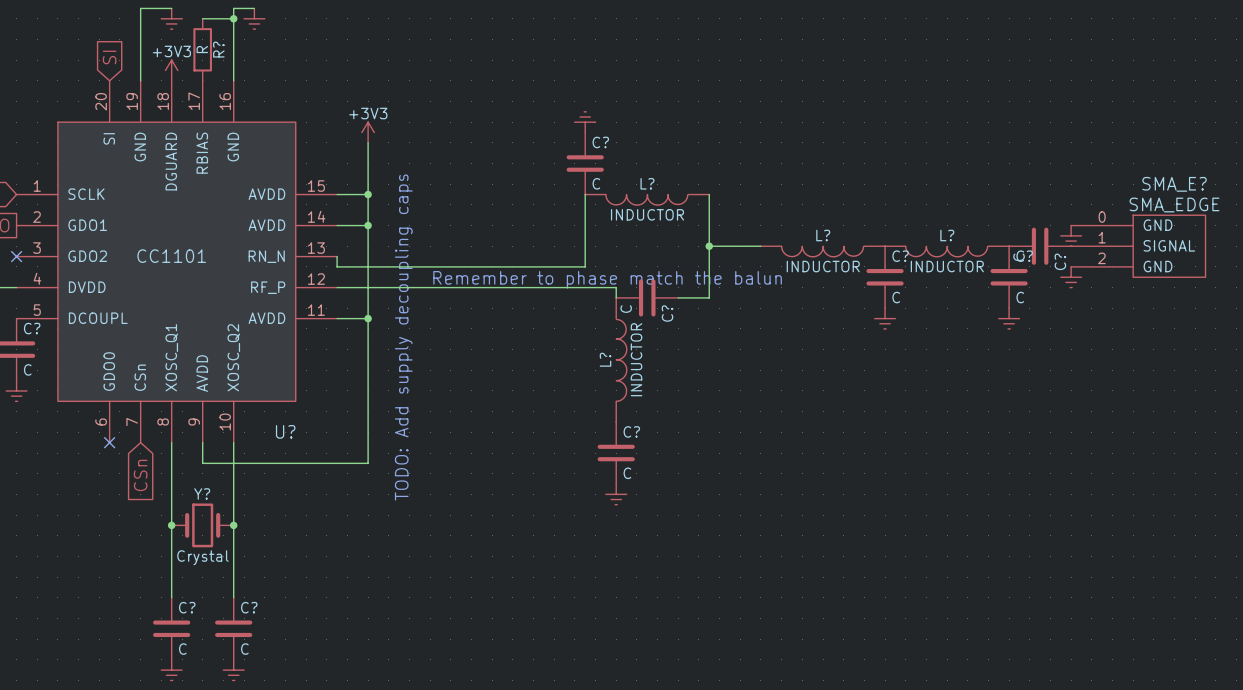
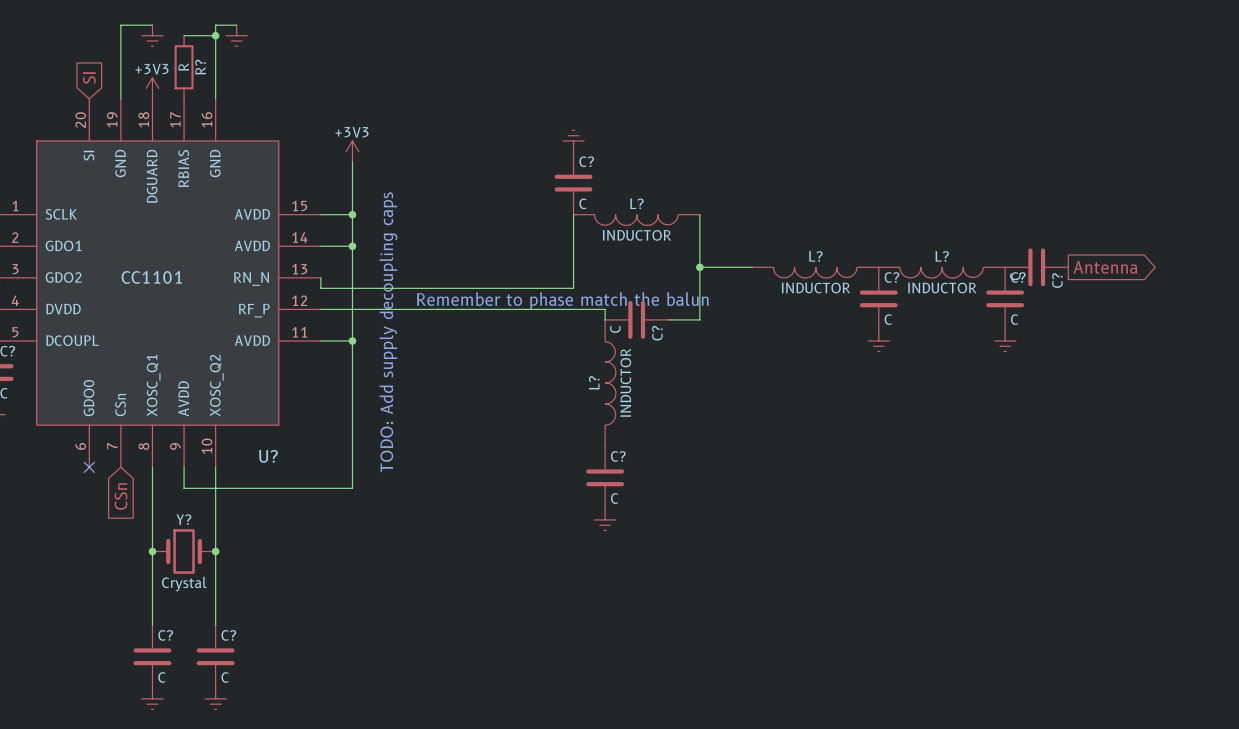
power symbol: (1071, 235) -> none
global label: none -> Antenna (1105, 267)
SMA_E?: SMA_EDGE (1138, 246) -> none
power symbol: (1071, 277) -> none

